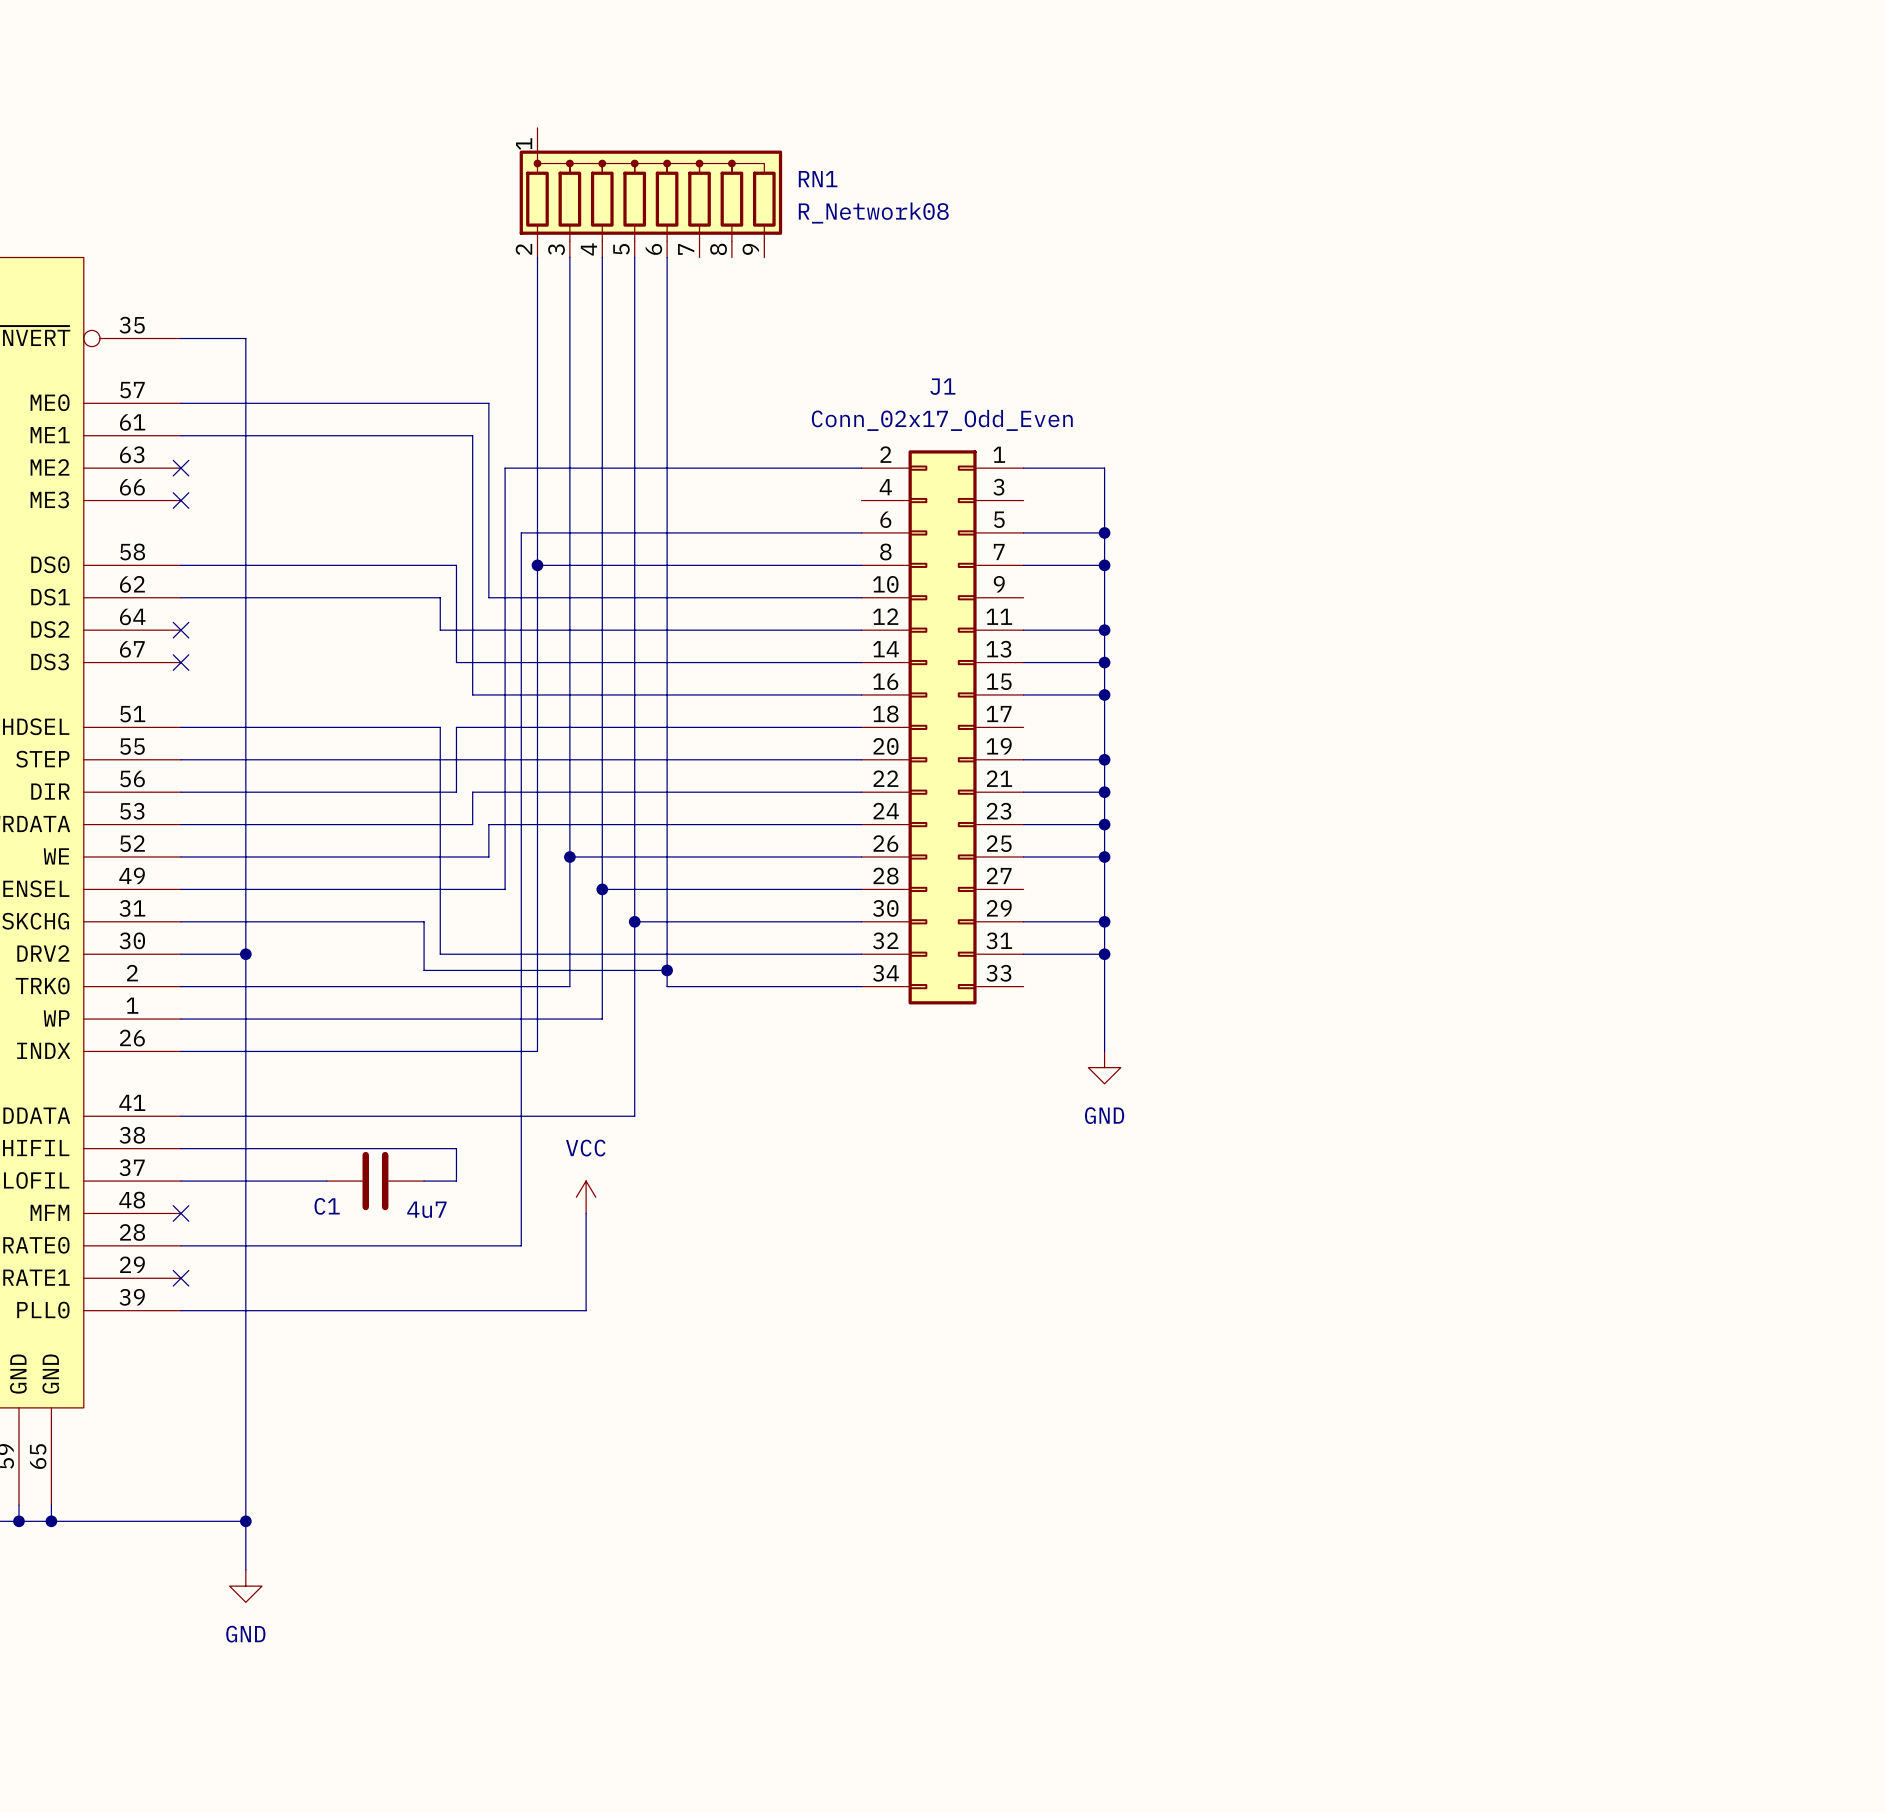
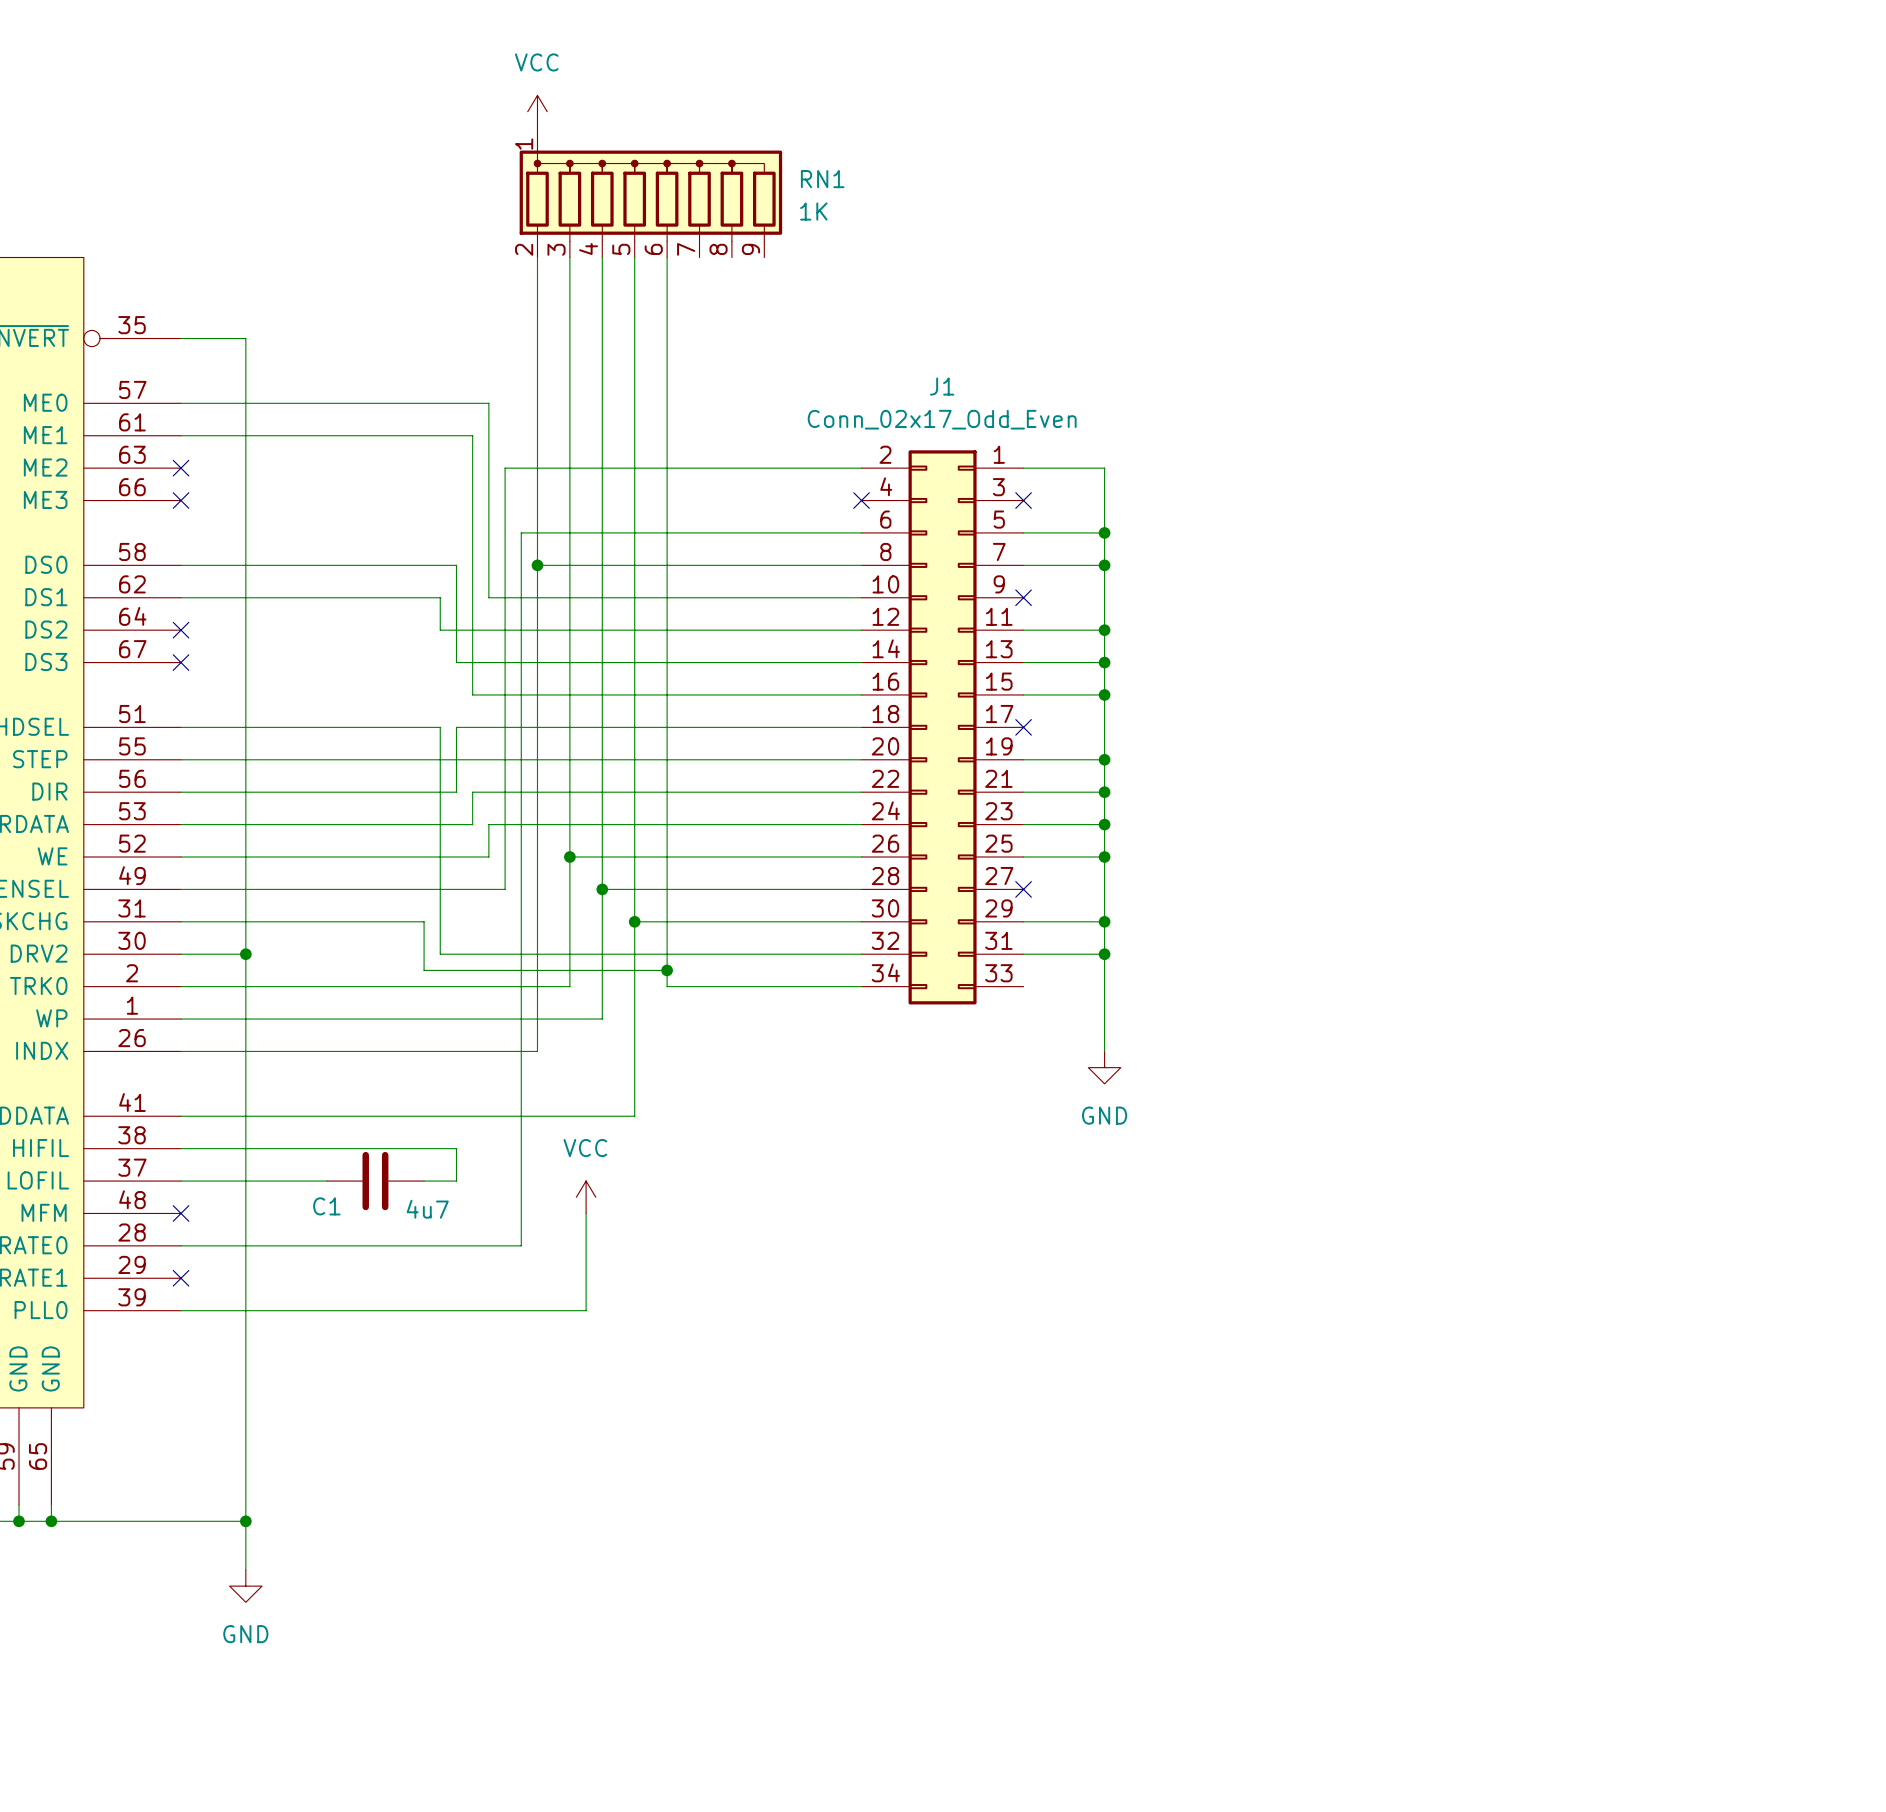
power symbol: none -> VCC (537, 111)
RN1 value: R_Network08 (873, 213) -> 1K (813, 211)
no-connect mark: none -> (861, 500)
no-connect mark: none -> (1023, 500)
no-connect mark: none -> (1023, 597)
no-connect mark: none -> (1023, 727)
no-connect mark: none -> (1023, 889)

